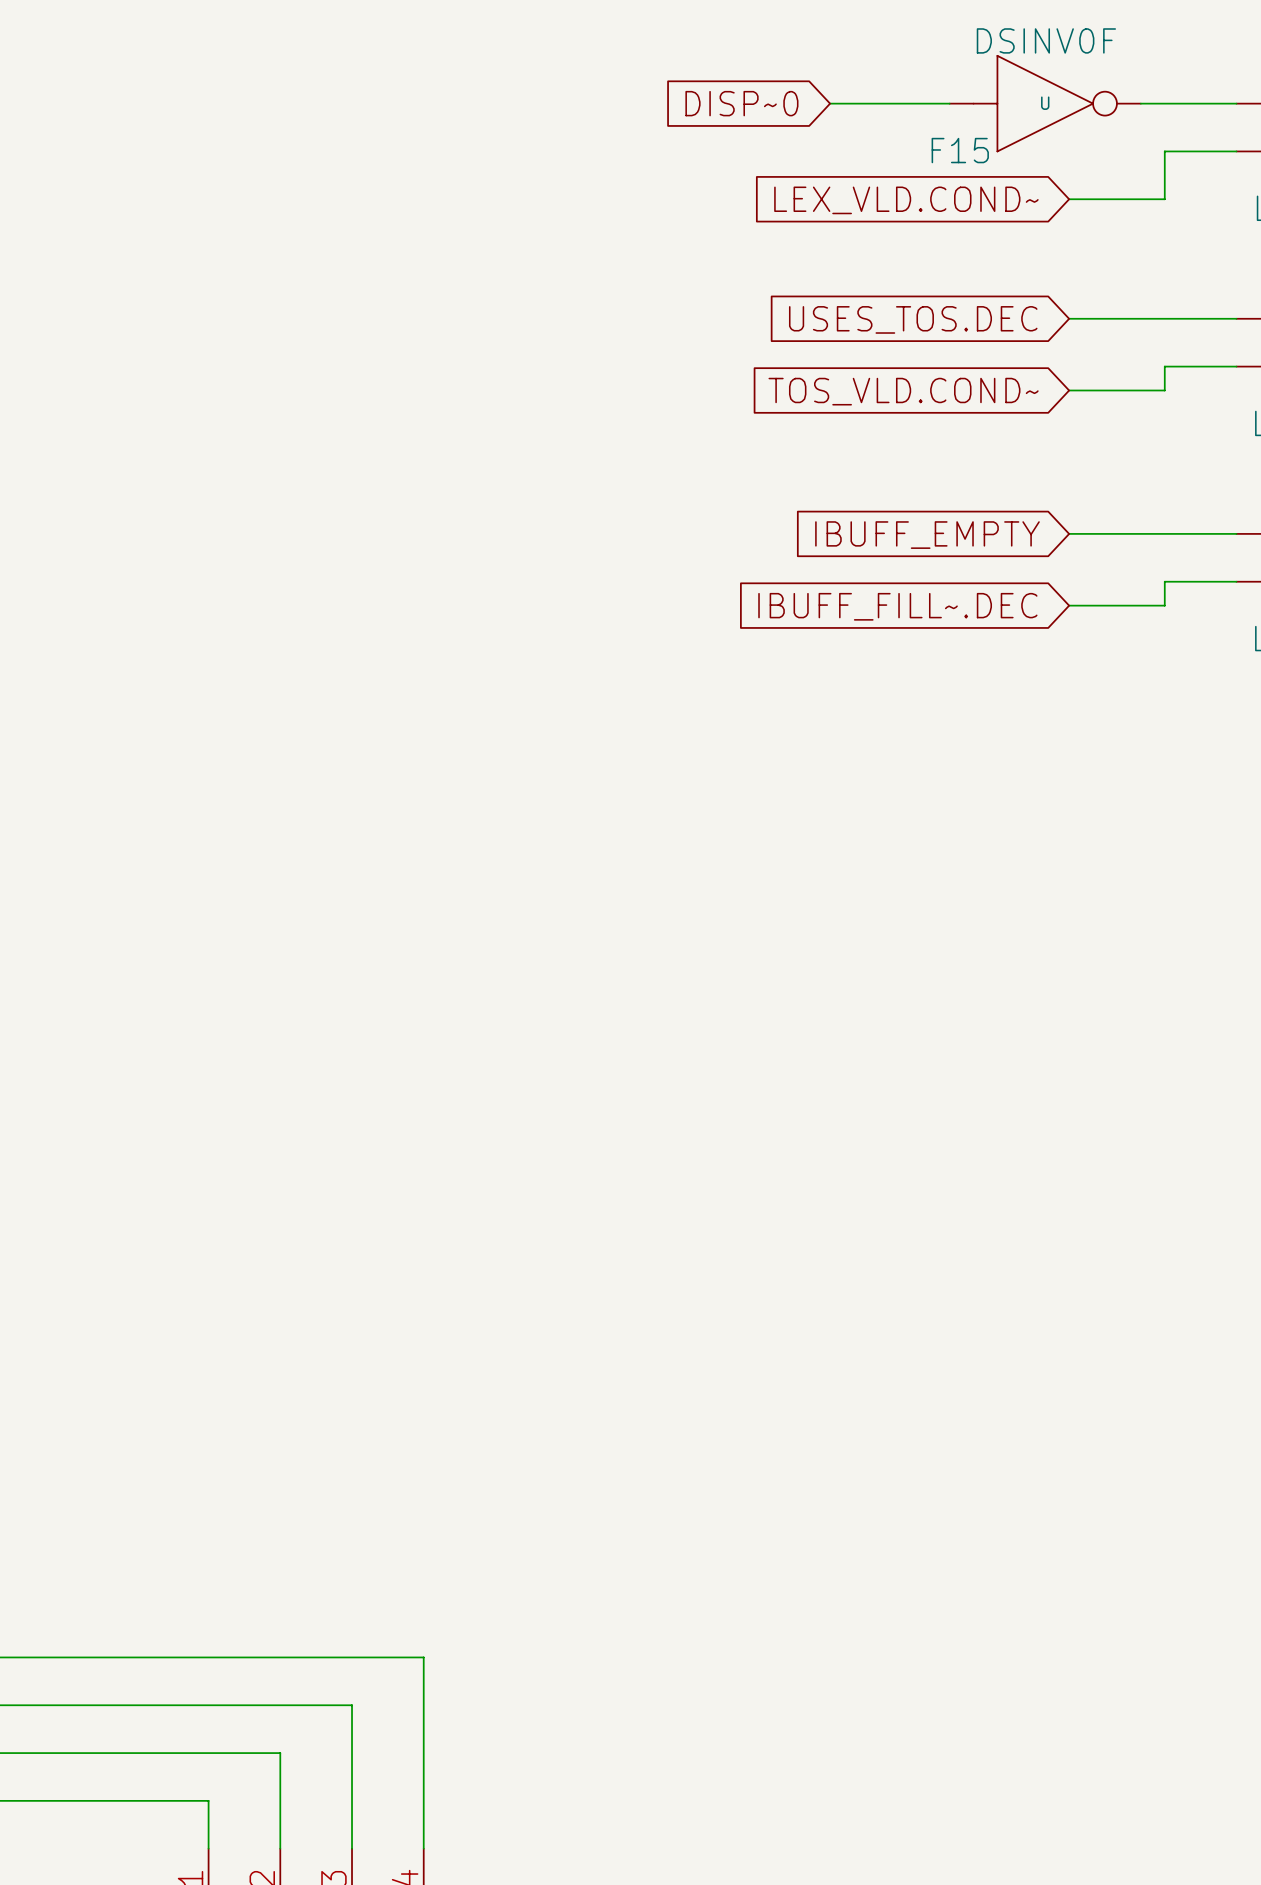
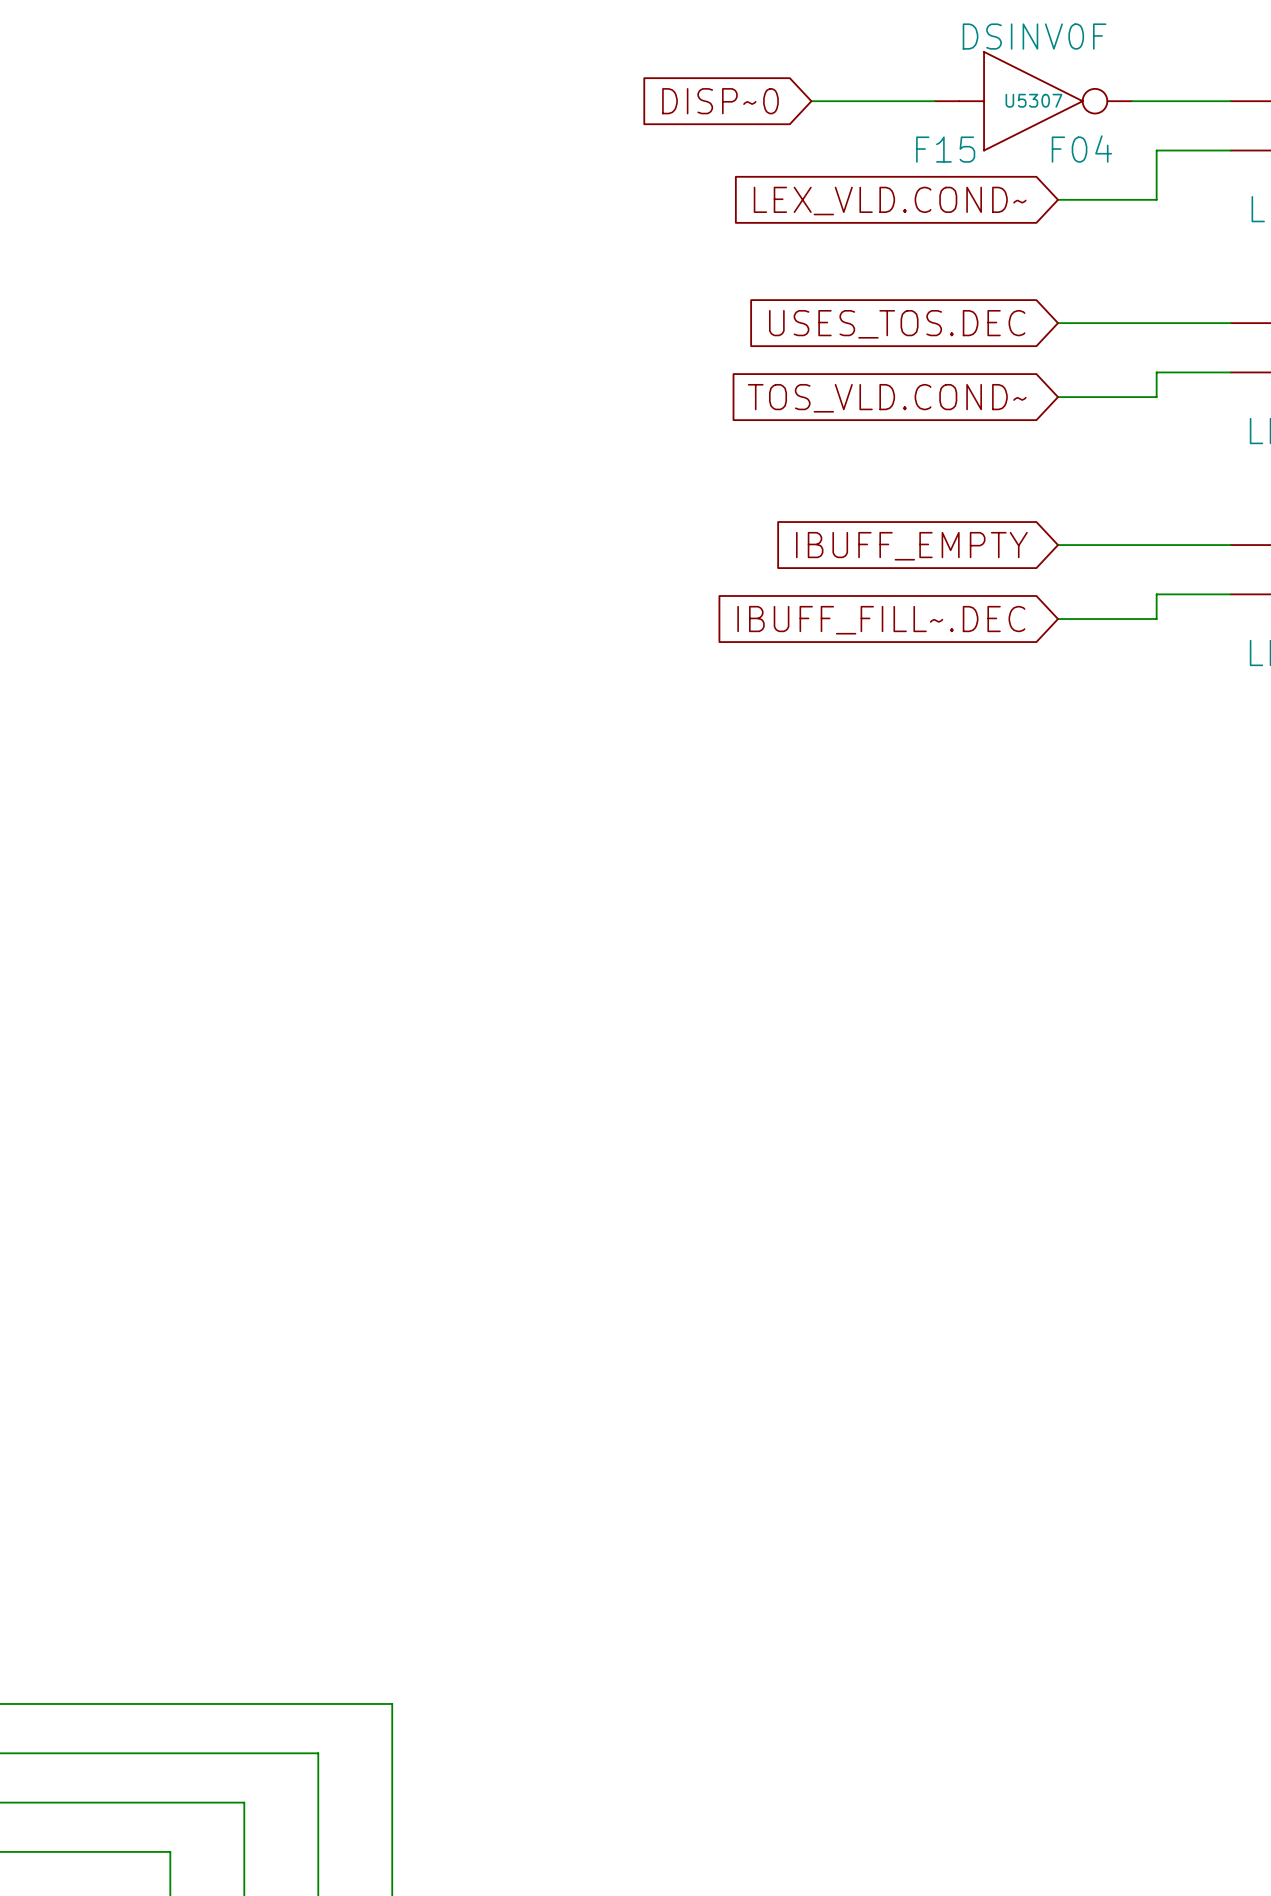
U name: U (1045, 103) -> U5307 (1033, 100)
U value: none -> F04 (1081, 149)

